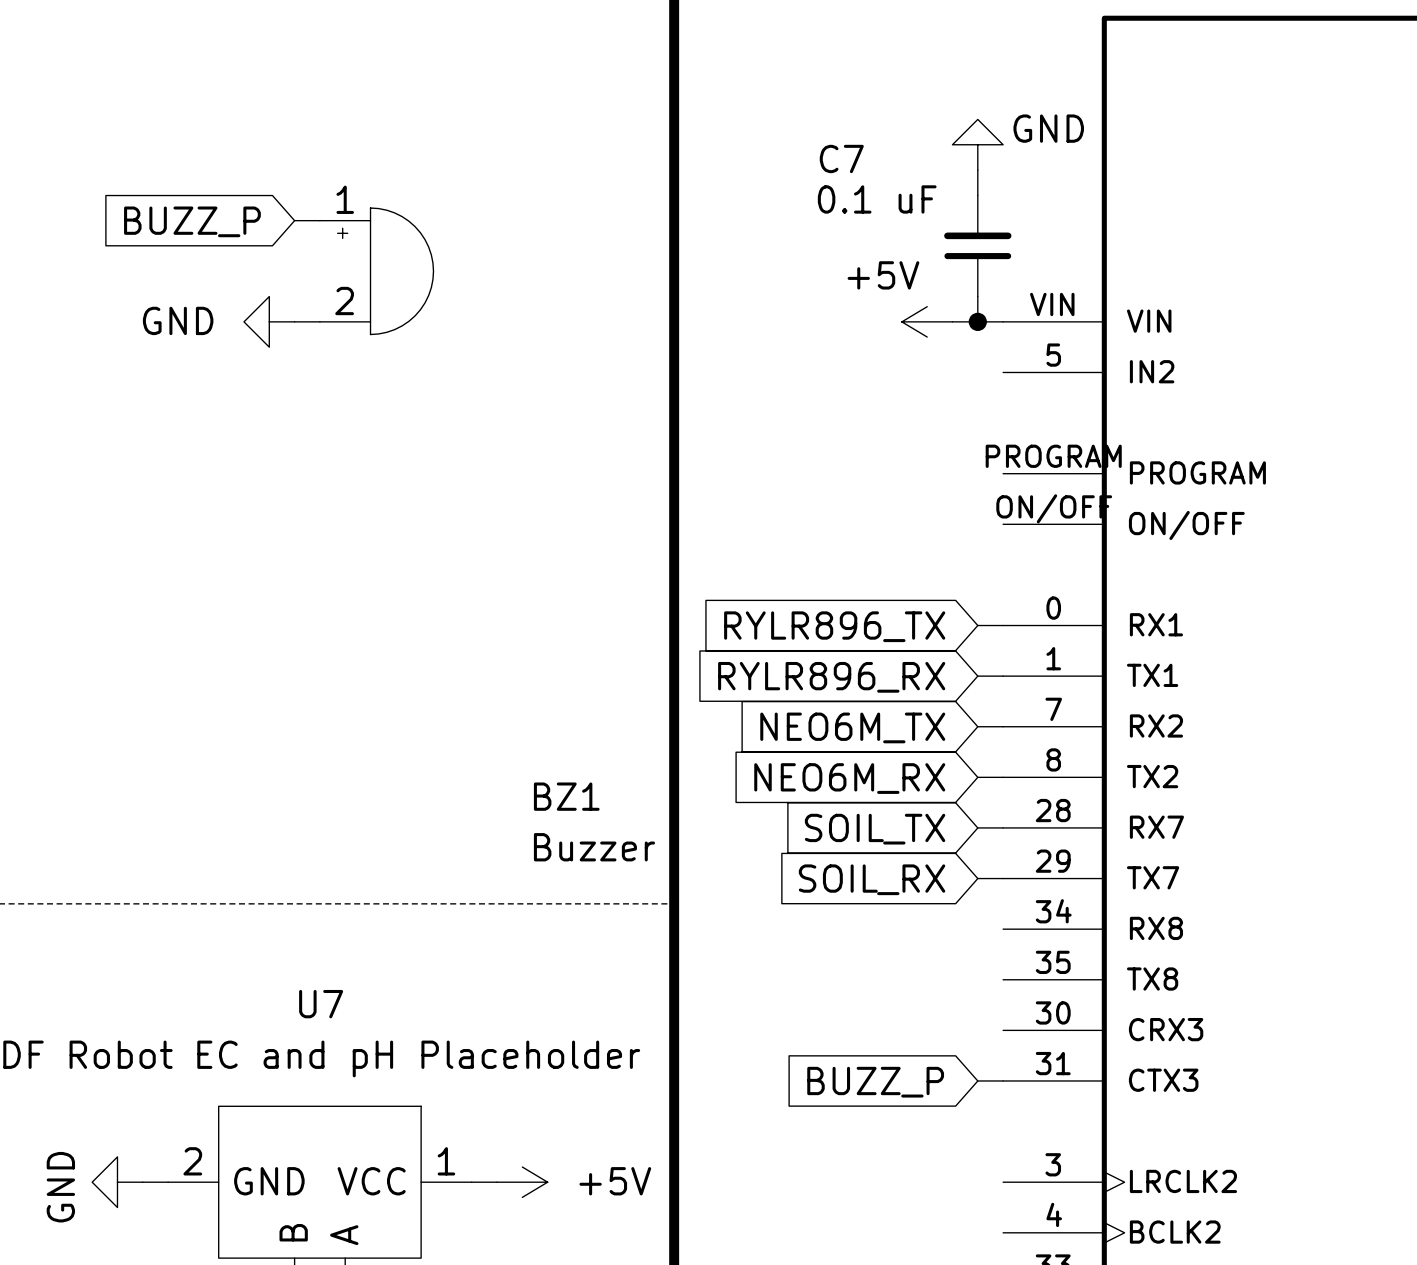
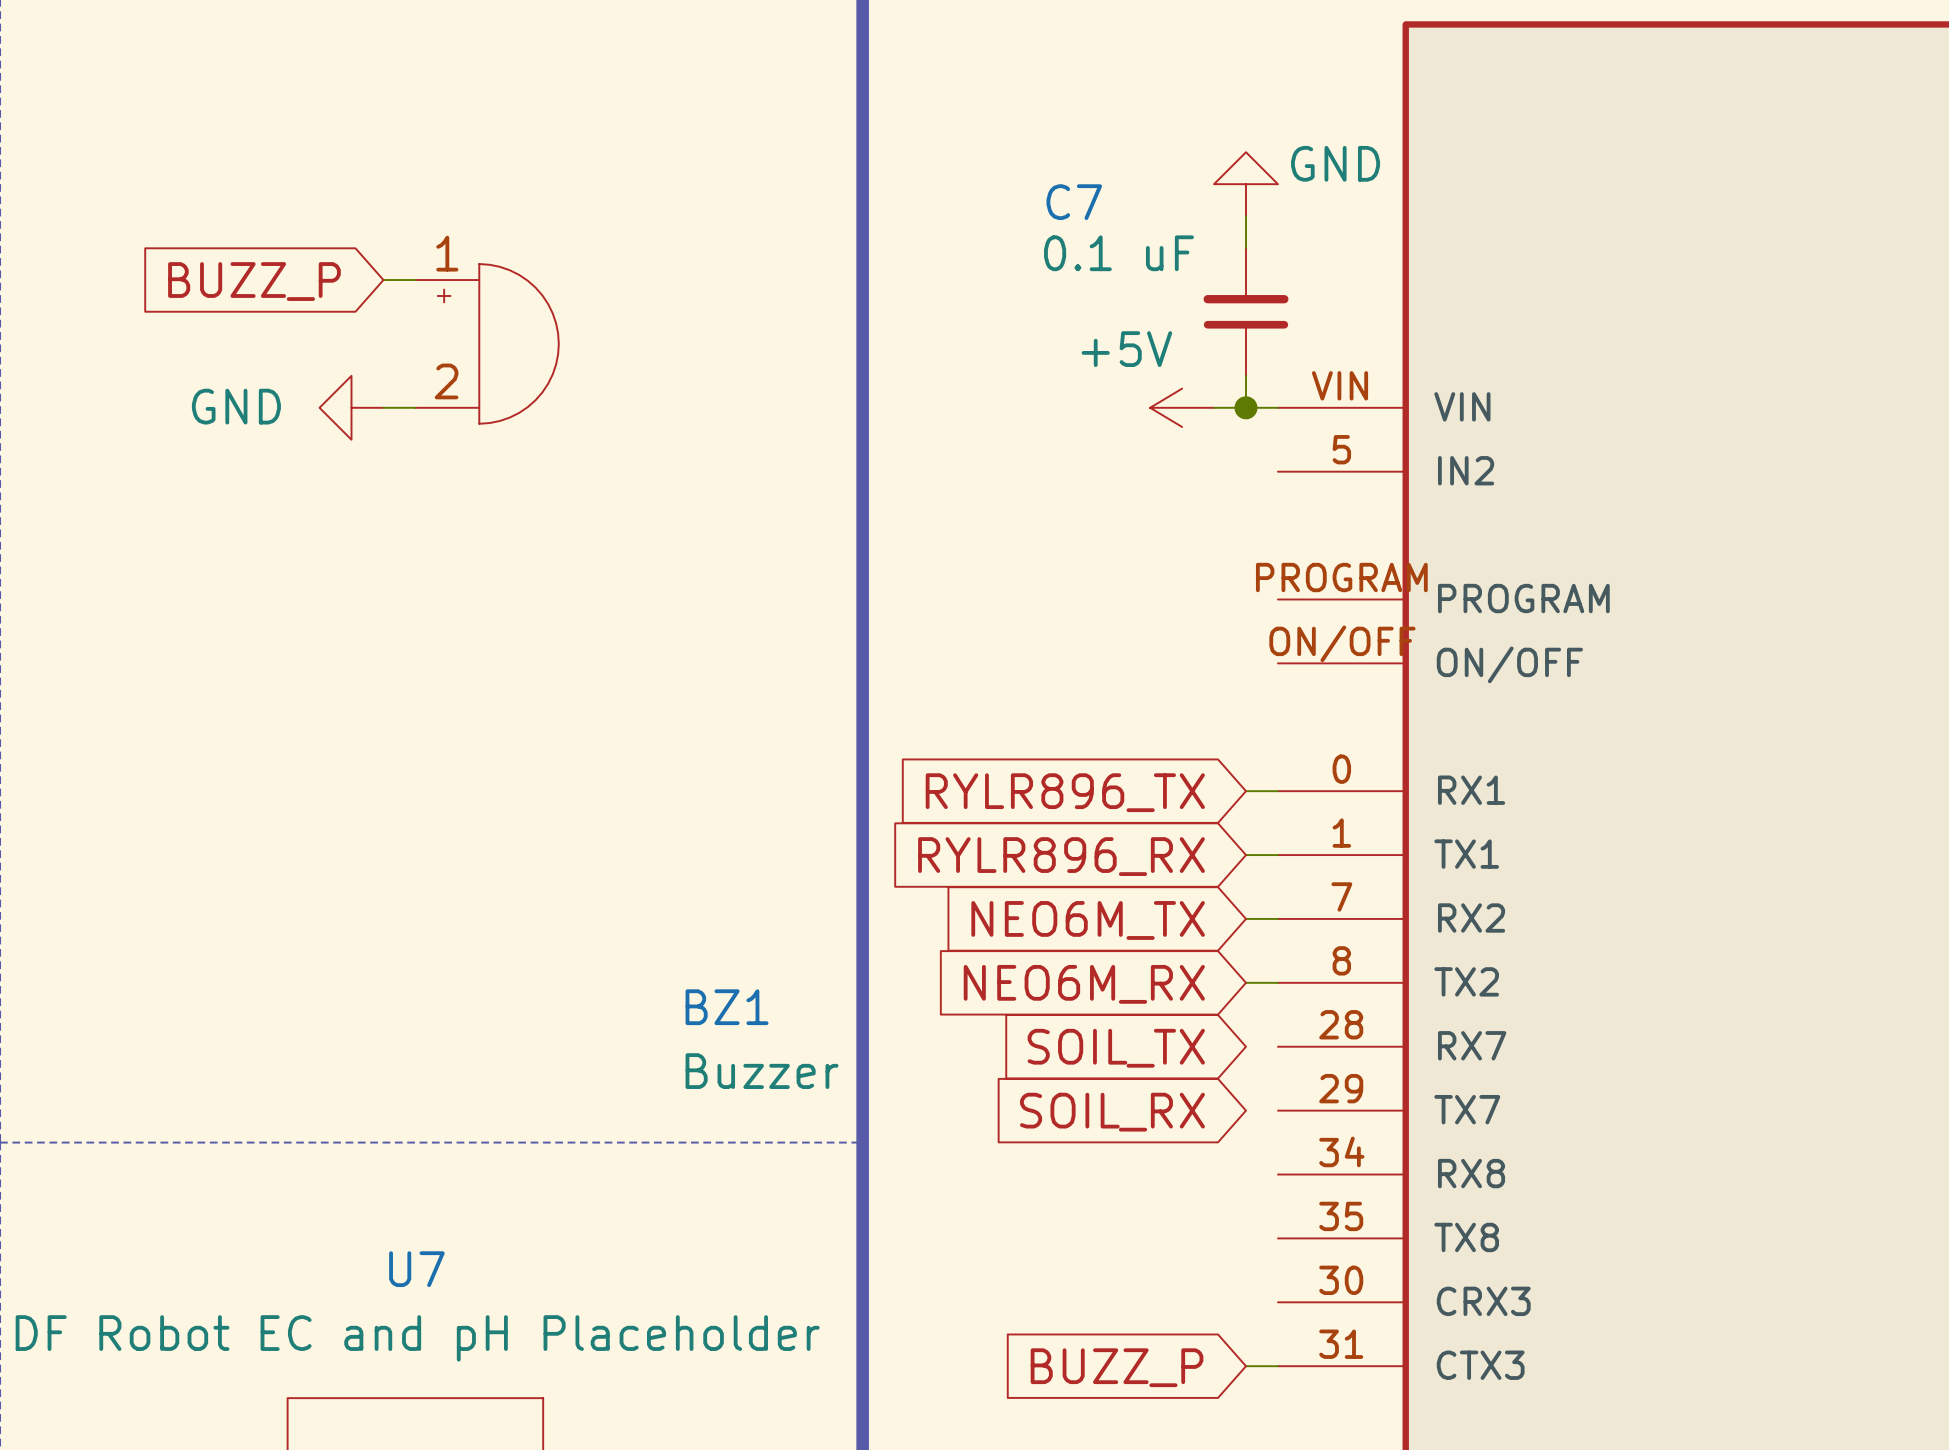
wire: (977, 827) (1003, 827) -> none
wire: (977, 878) (1003, 878) -> none

